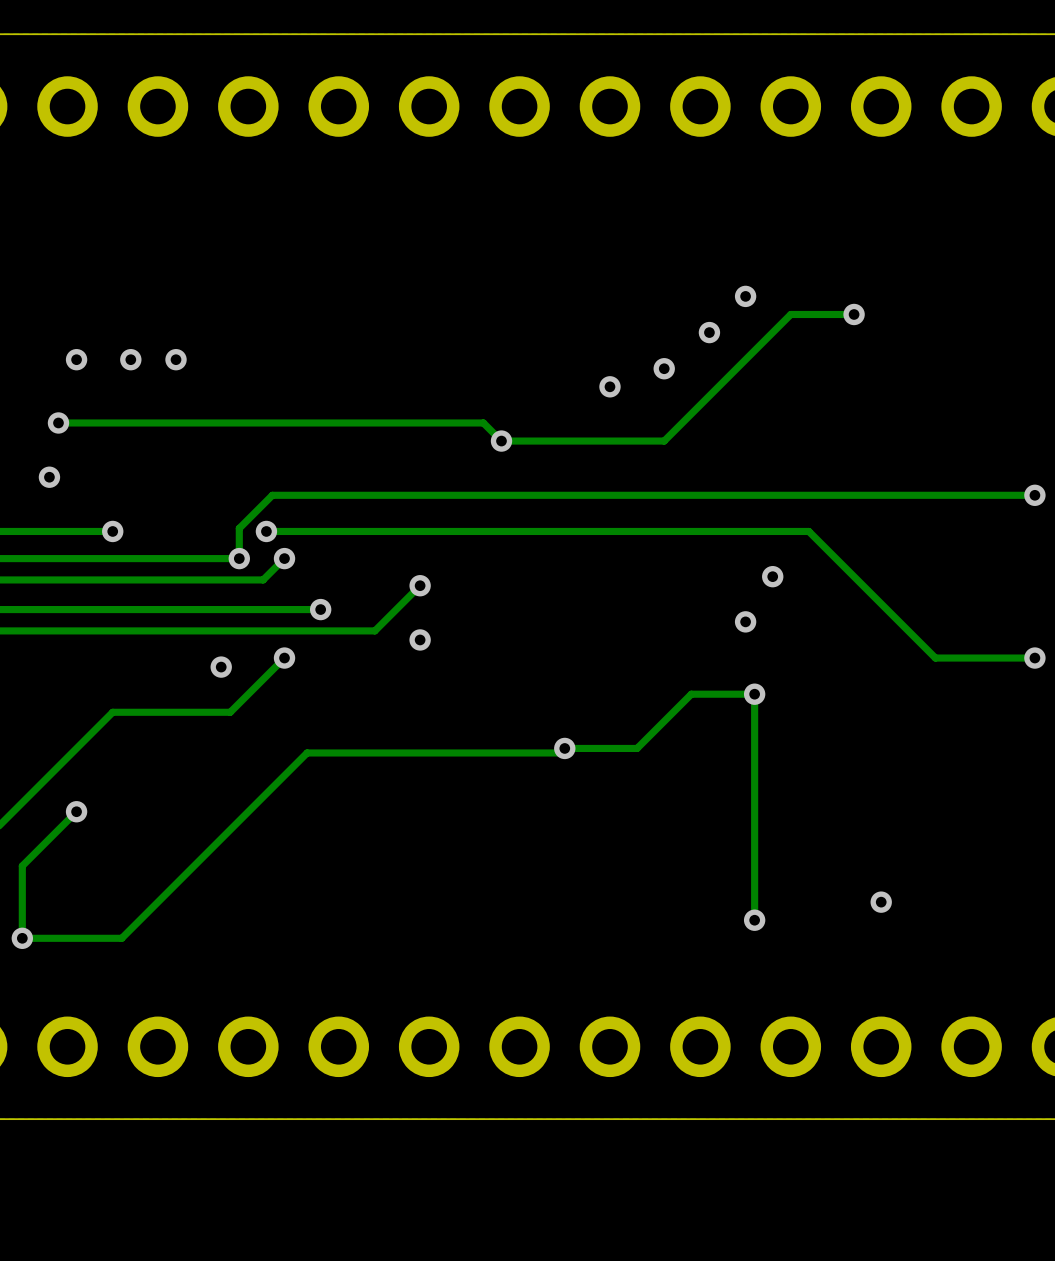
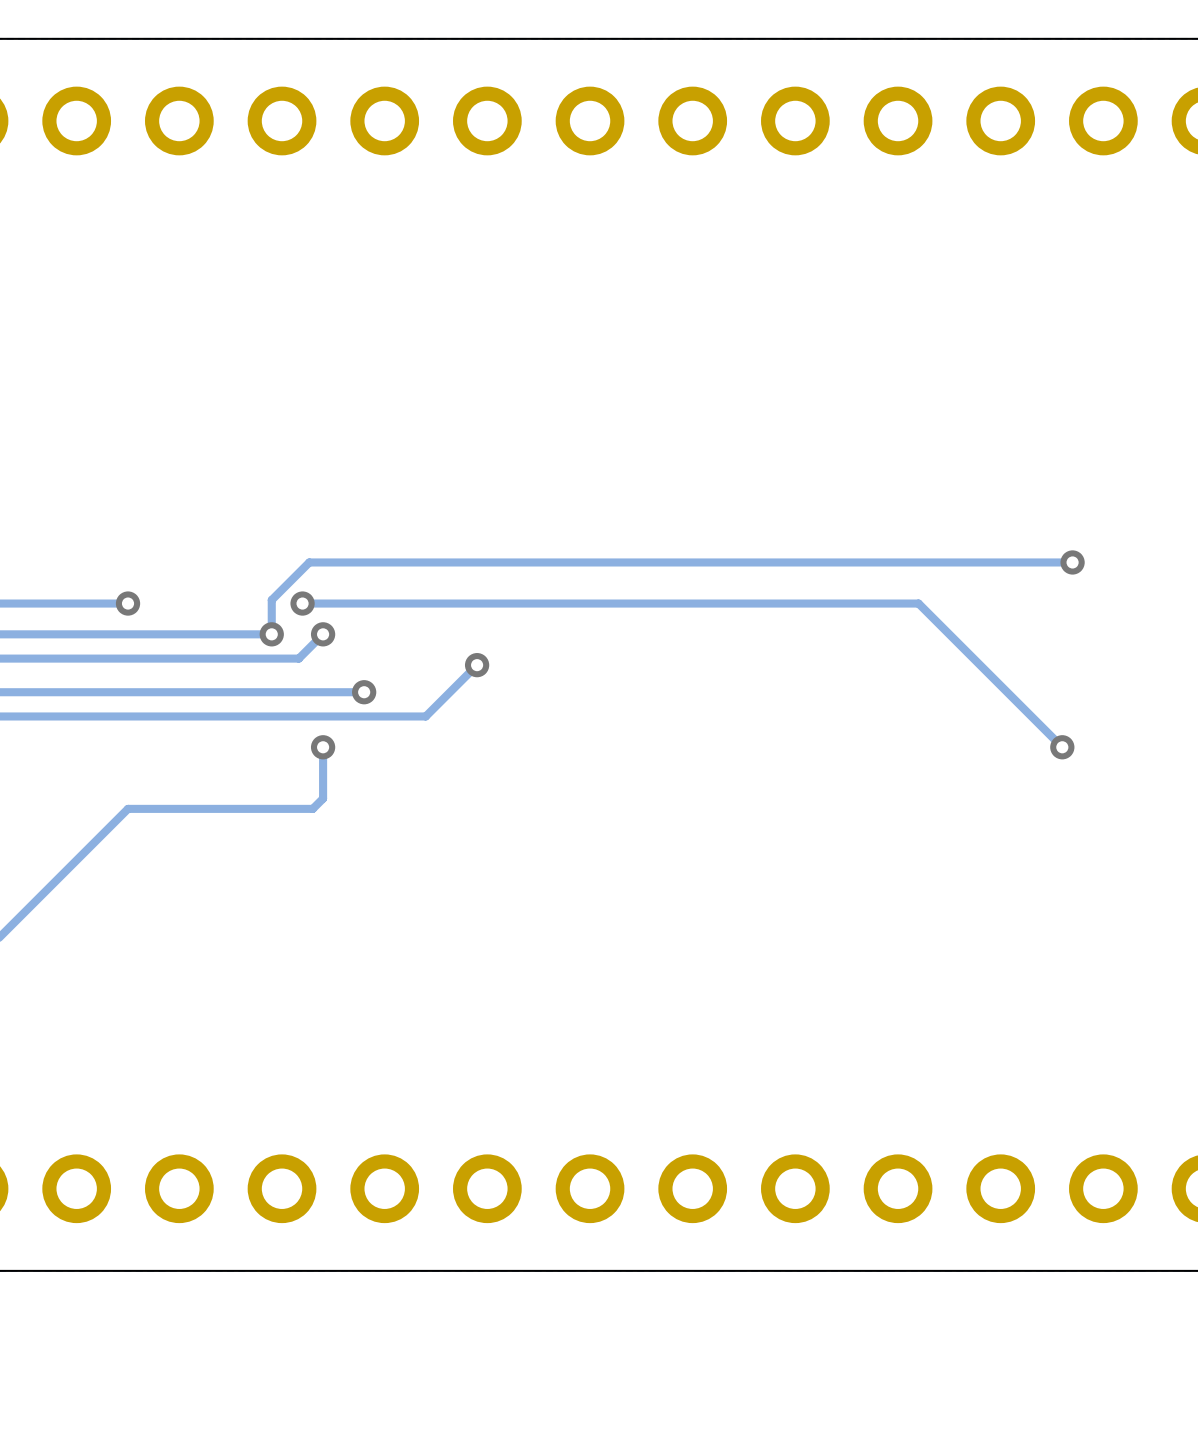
via: (745, 296) -> none
track: (854, 314) (790, 314) (664, 441) (501, 441) (483, 422) (58, 422) -> none
via: (854, 314) -> none
via: (709, 332) -> none
via: (76, 359) -> none
via: (130, 359) -> none
via: (176, 359) -> none
via: (664, 368) -> none
via: (609, 386) -> none
via: (58, 422) -> none
via: (501, 441) -> none
via: (49, 477) -> none
track: (1034, 495) (944, 495) -> none
via position: (1034, 495) -> (1072, 562)
via: (772, 576) -> none
via: (745, 621) -> none
via: (420, 639) -> none
track: (284, 658) (230, 712) -> (323, 747) (323, 798) (312, 808) (261, 808)
via: none -> (1062, 747)
track: (1034, 658) (935, 658) -> none
via: (1034, 658) -> none
via: (221, 667) -> none
via: (754, 694) -> none
via: (564, 748) -> none
track: (76, 811) (22, 865) (22, 938) (121, 938) (307, 752) (560, 752) (564, 748) (637, 748) (691, 694) (754, 694) (754, 920) -> none
via: (76, 811) -> none
via: (881, 902) -> none
via: (754, 920) -> none
via: (22, 938) -> none

